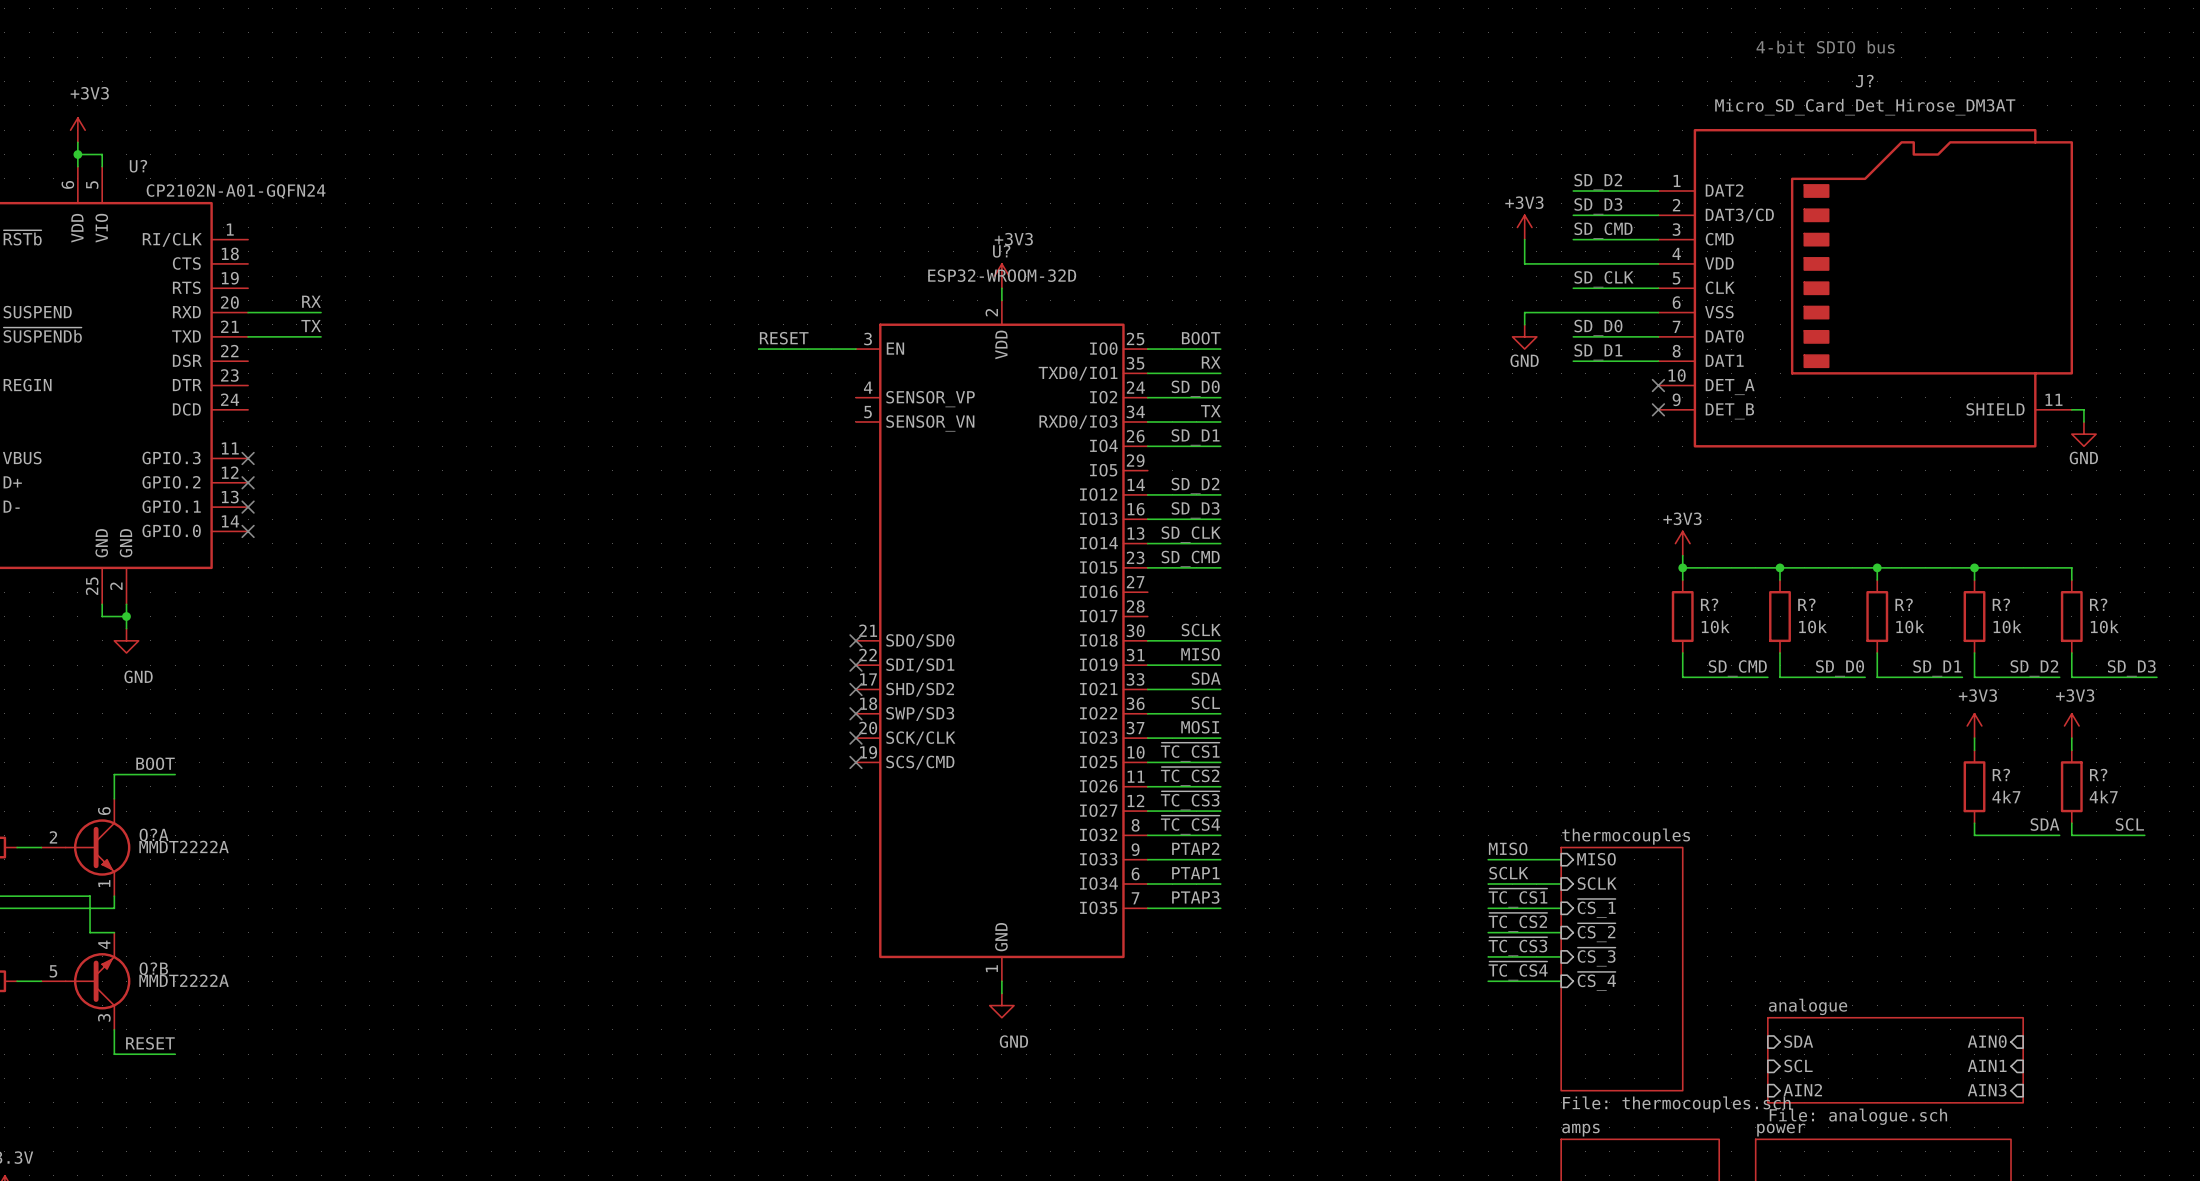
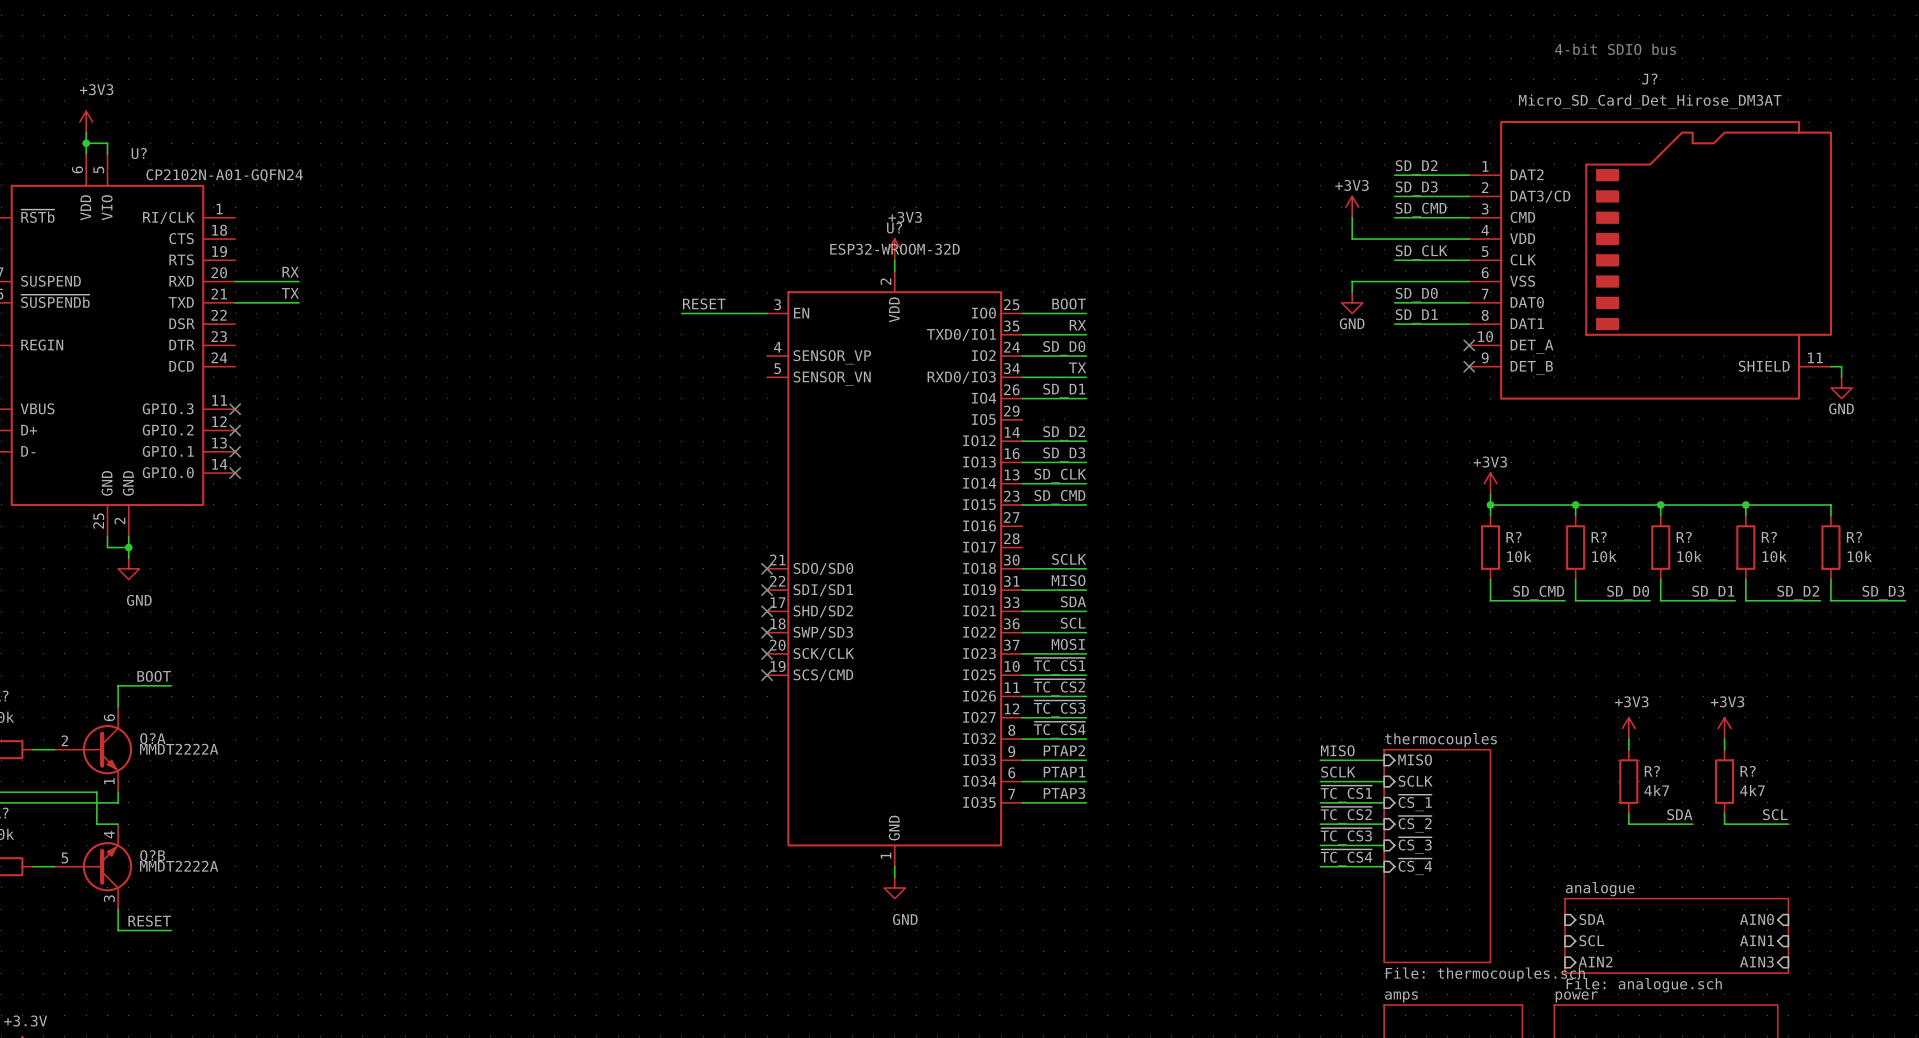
power symbol: +3V3 (1974, 725) -> none
power symbol: +3V3 (2071, 725) -> none
wire: (1974, 738) (1974, 750) -> (1628, 739) (1628, 749)
wire: (2071, 738) (2071, 750) -> (1724, 739) (1724, 749)
R?: 4k7 (1974, 786) -> none
R?: 4k7 (2071, 786) -> none
power symbol: none -> +3V3 (1628, 728)
power symbol: none -> +3V3 (1724, 728)
wire: (1974, 823) (1974, 835) (2059, 835) -> none
wire: (2071, 823) (2071, 835) (2144, 835) -> (1724, 813) (1724, 824) (1788, 824)
label position: SDA (2044, 824) -> SDA (1679, 814)
label position: SCL (2129, 824) -> SCL (1775, 814)
R?: none -> 4k7 (1628, 781)
R?: none -> 4k7 (1724, 781)
wire: none -> (1628, 813) (1628, 824) (1692, 824)

